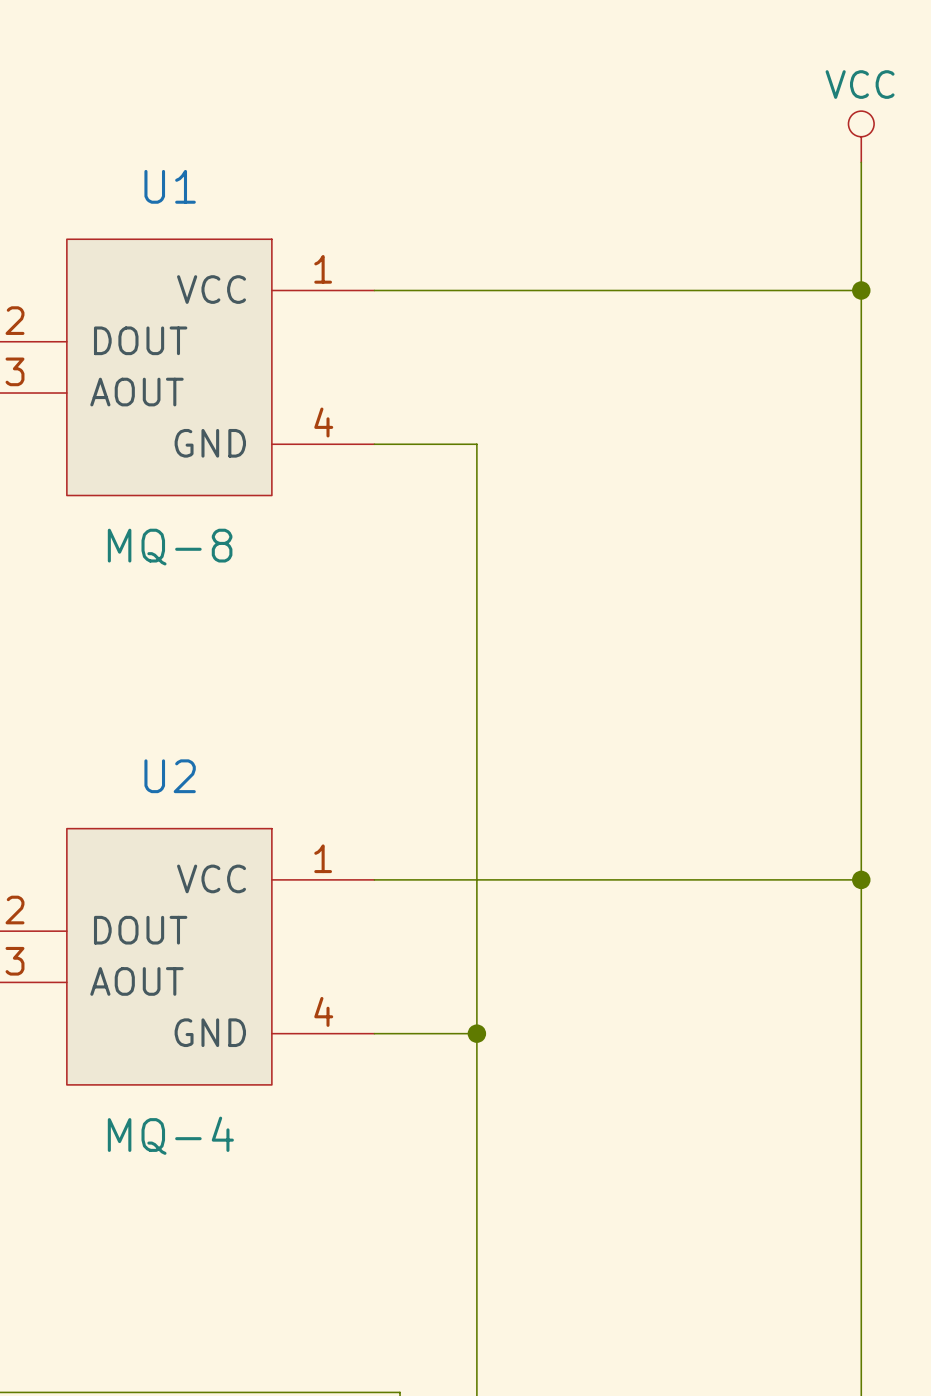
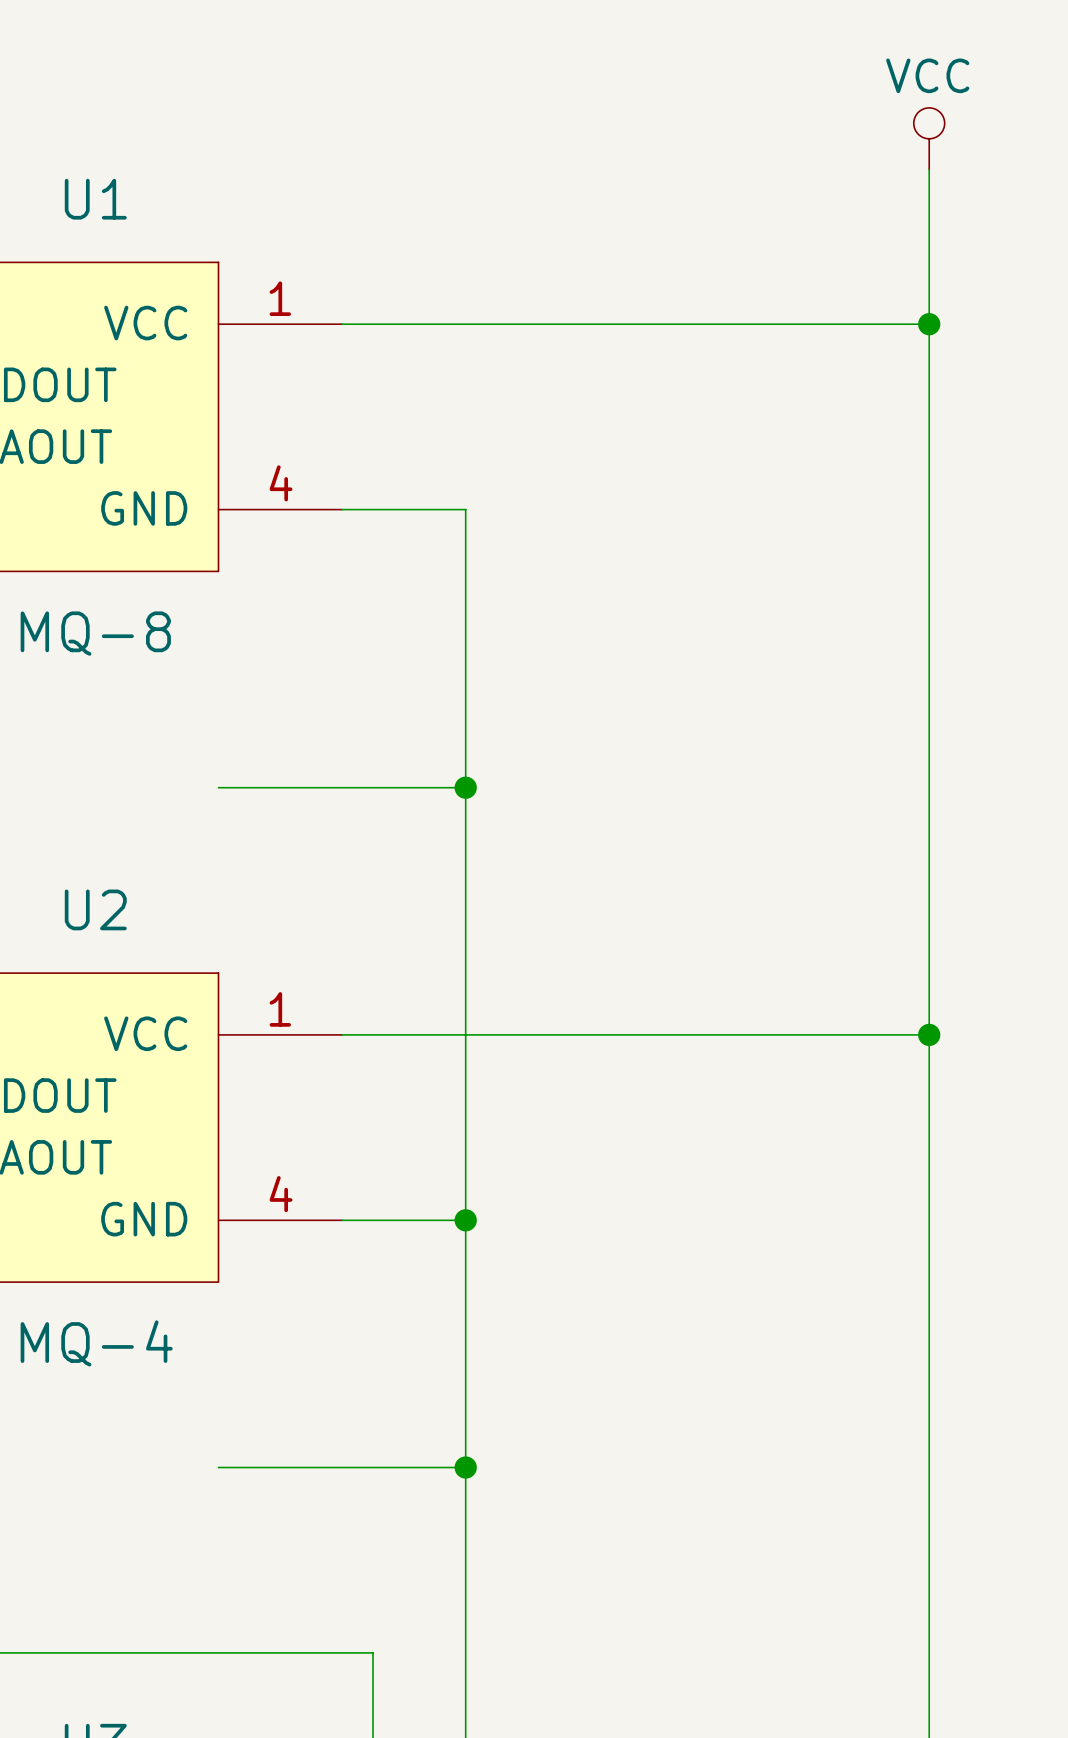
wire: none -> (218, 787) (465, 787)
junction: none -> (465, 787)
wire: none -> (218, 1467) (465, 1467)
junction: none -> (465, 1467)

